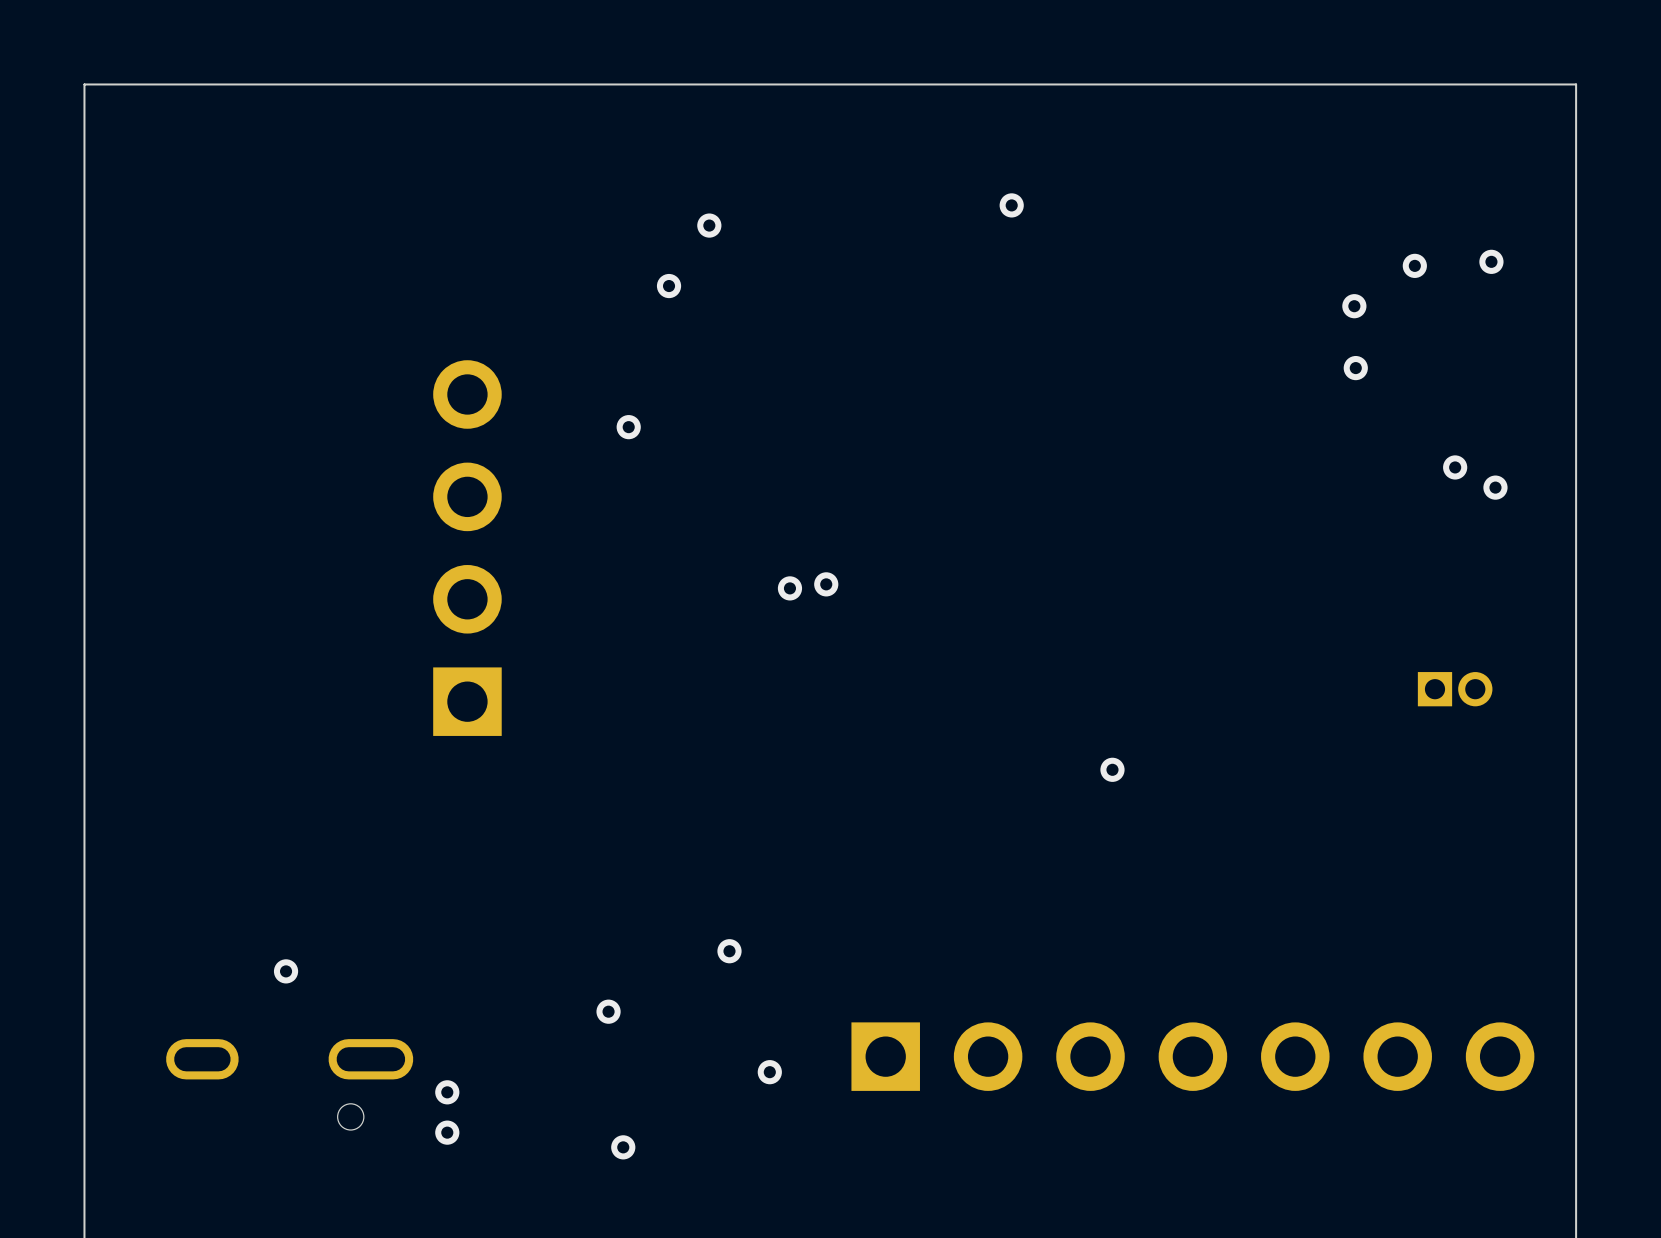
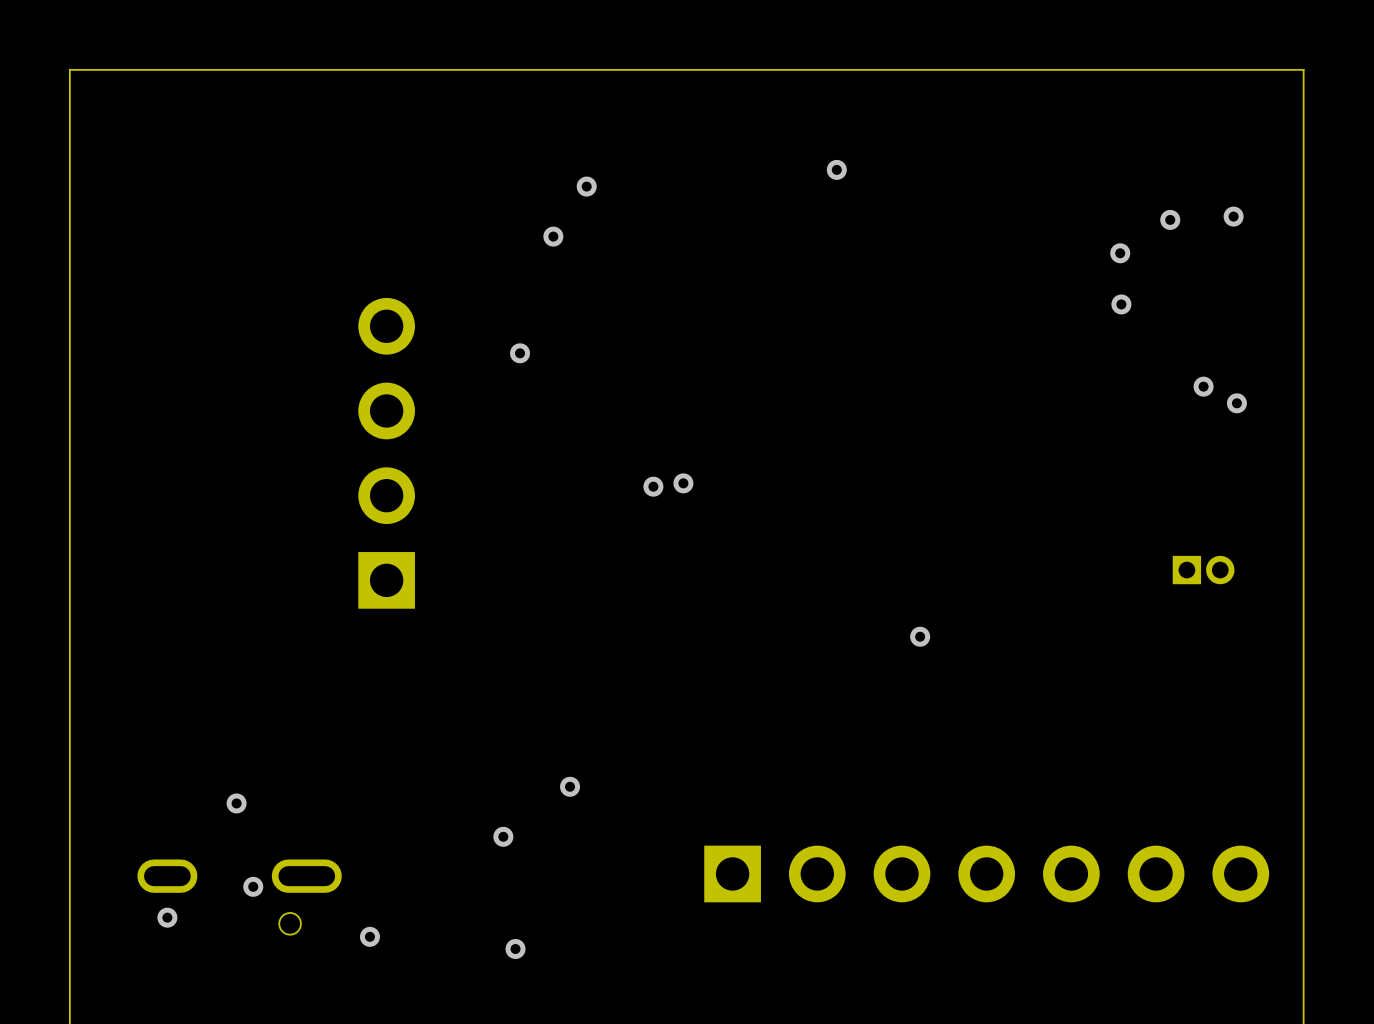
via position: (729, 951) -> (570, 786)
via: none -> (253, 886)
via: (769, 1072) -> none
via: (447, 1092) -> none
via: none -> (167, 917)

